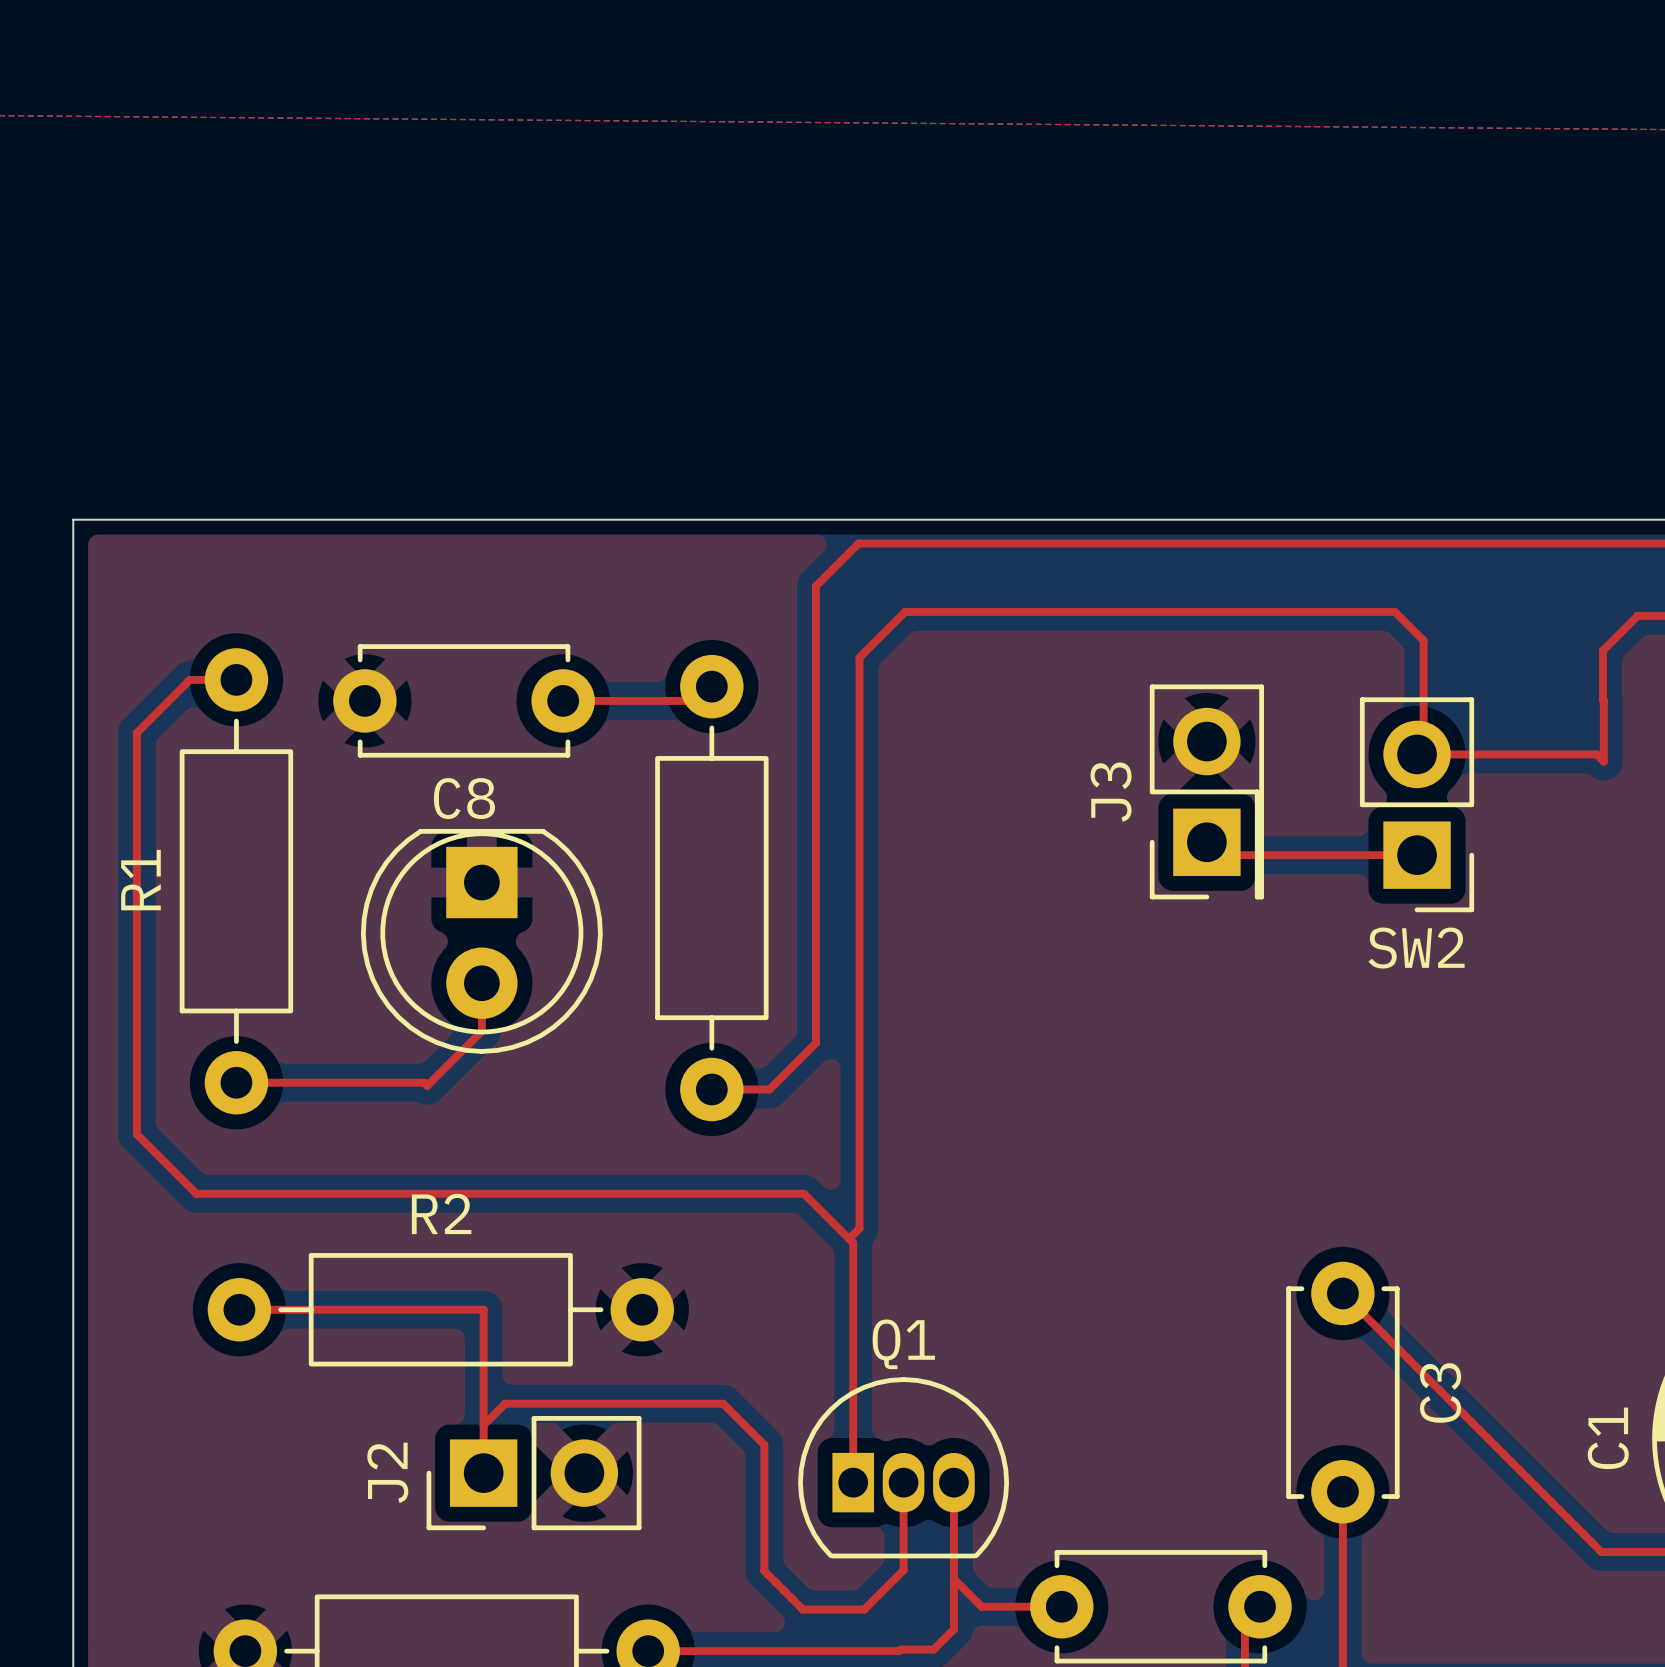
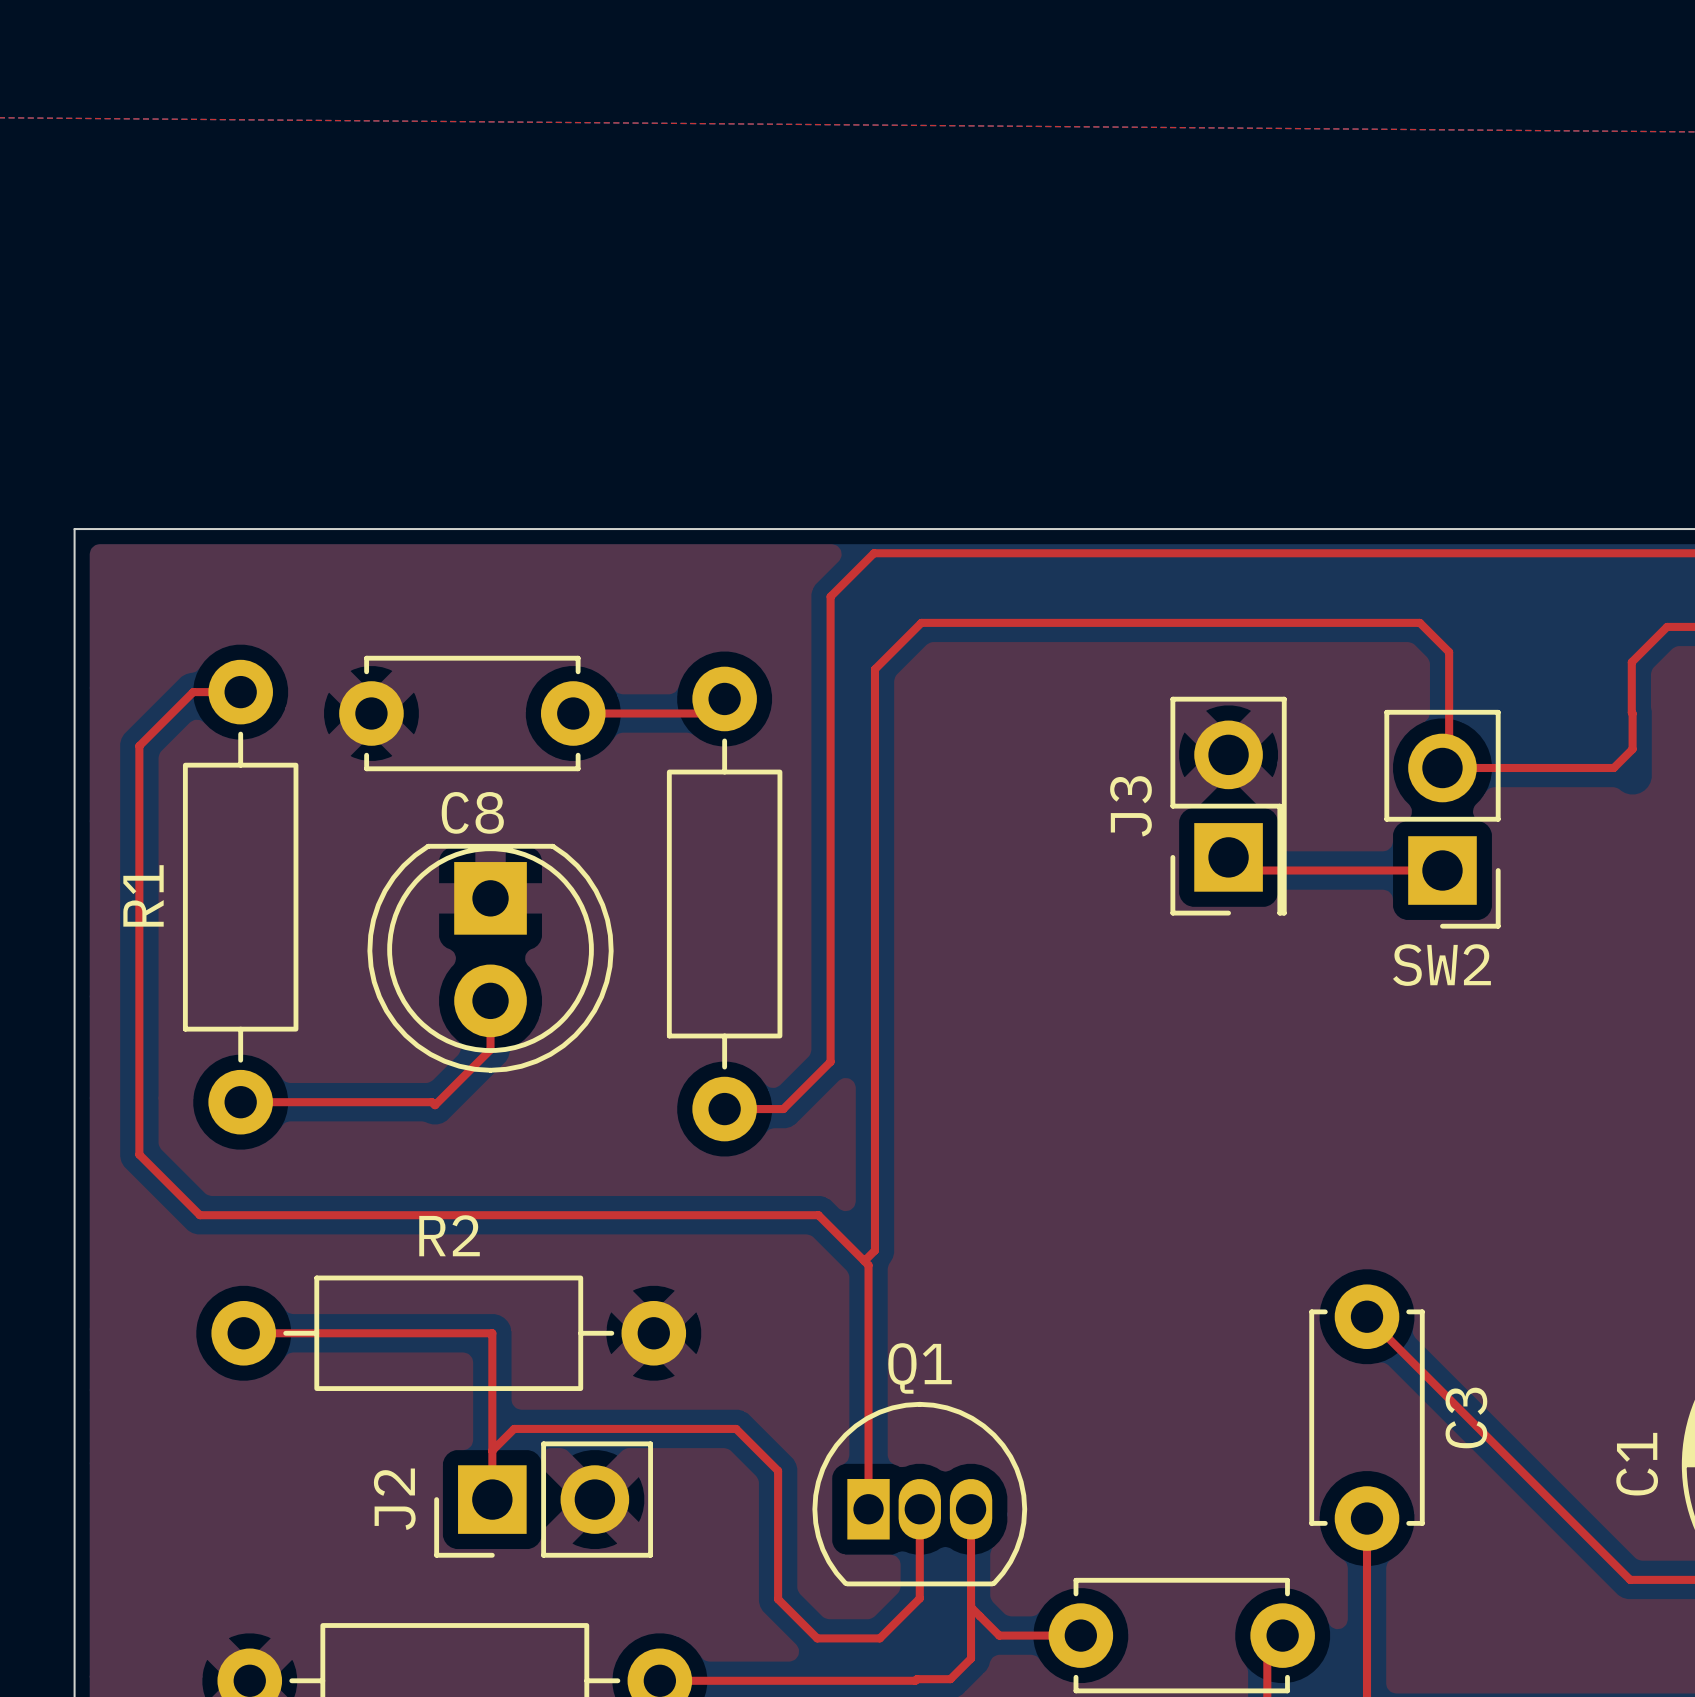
top track: (1603, 736) (1603, 761) (1596, 754) (1585, 754) -> (1632, 749) (1613, 767)

